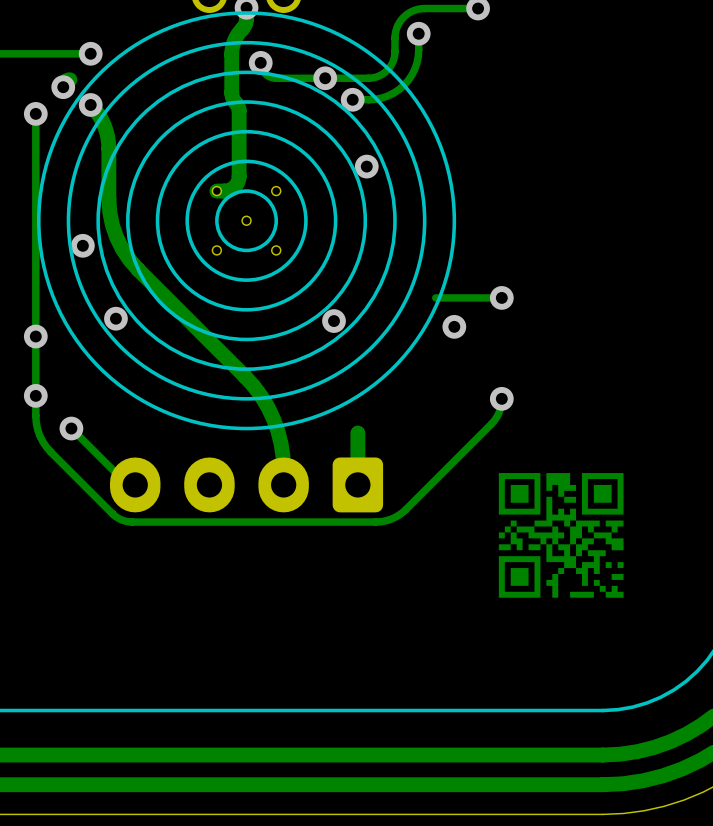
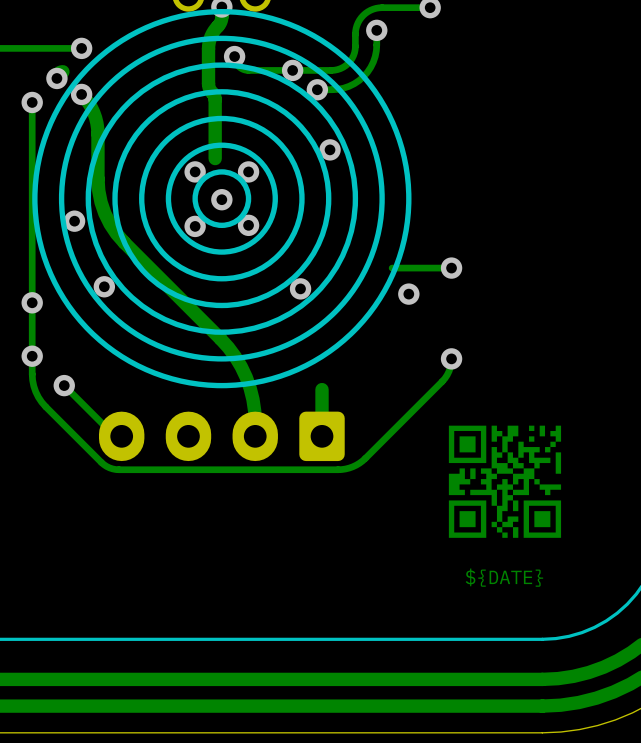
drawing: none -> [32, 9, 412, 389]
drawing: [36, 11, 457, 431] -> none
track: (239, 176) (237, 183) (231, 189) (216, 191) -> none
via: none -> (195, 171)
via: none -> (248, 171)
part: (246, 220) -> none
via: none -> (221, 199)
via: none -> (248, 225)
via: none -> (195, 226)
part footprint: [498, 473, 624, 598] -> [448, 425, 562, 538]

